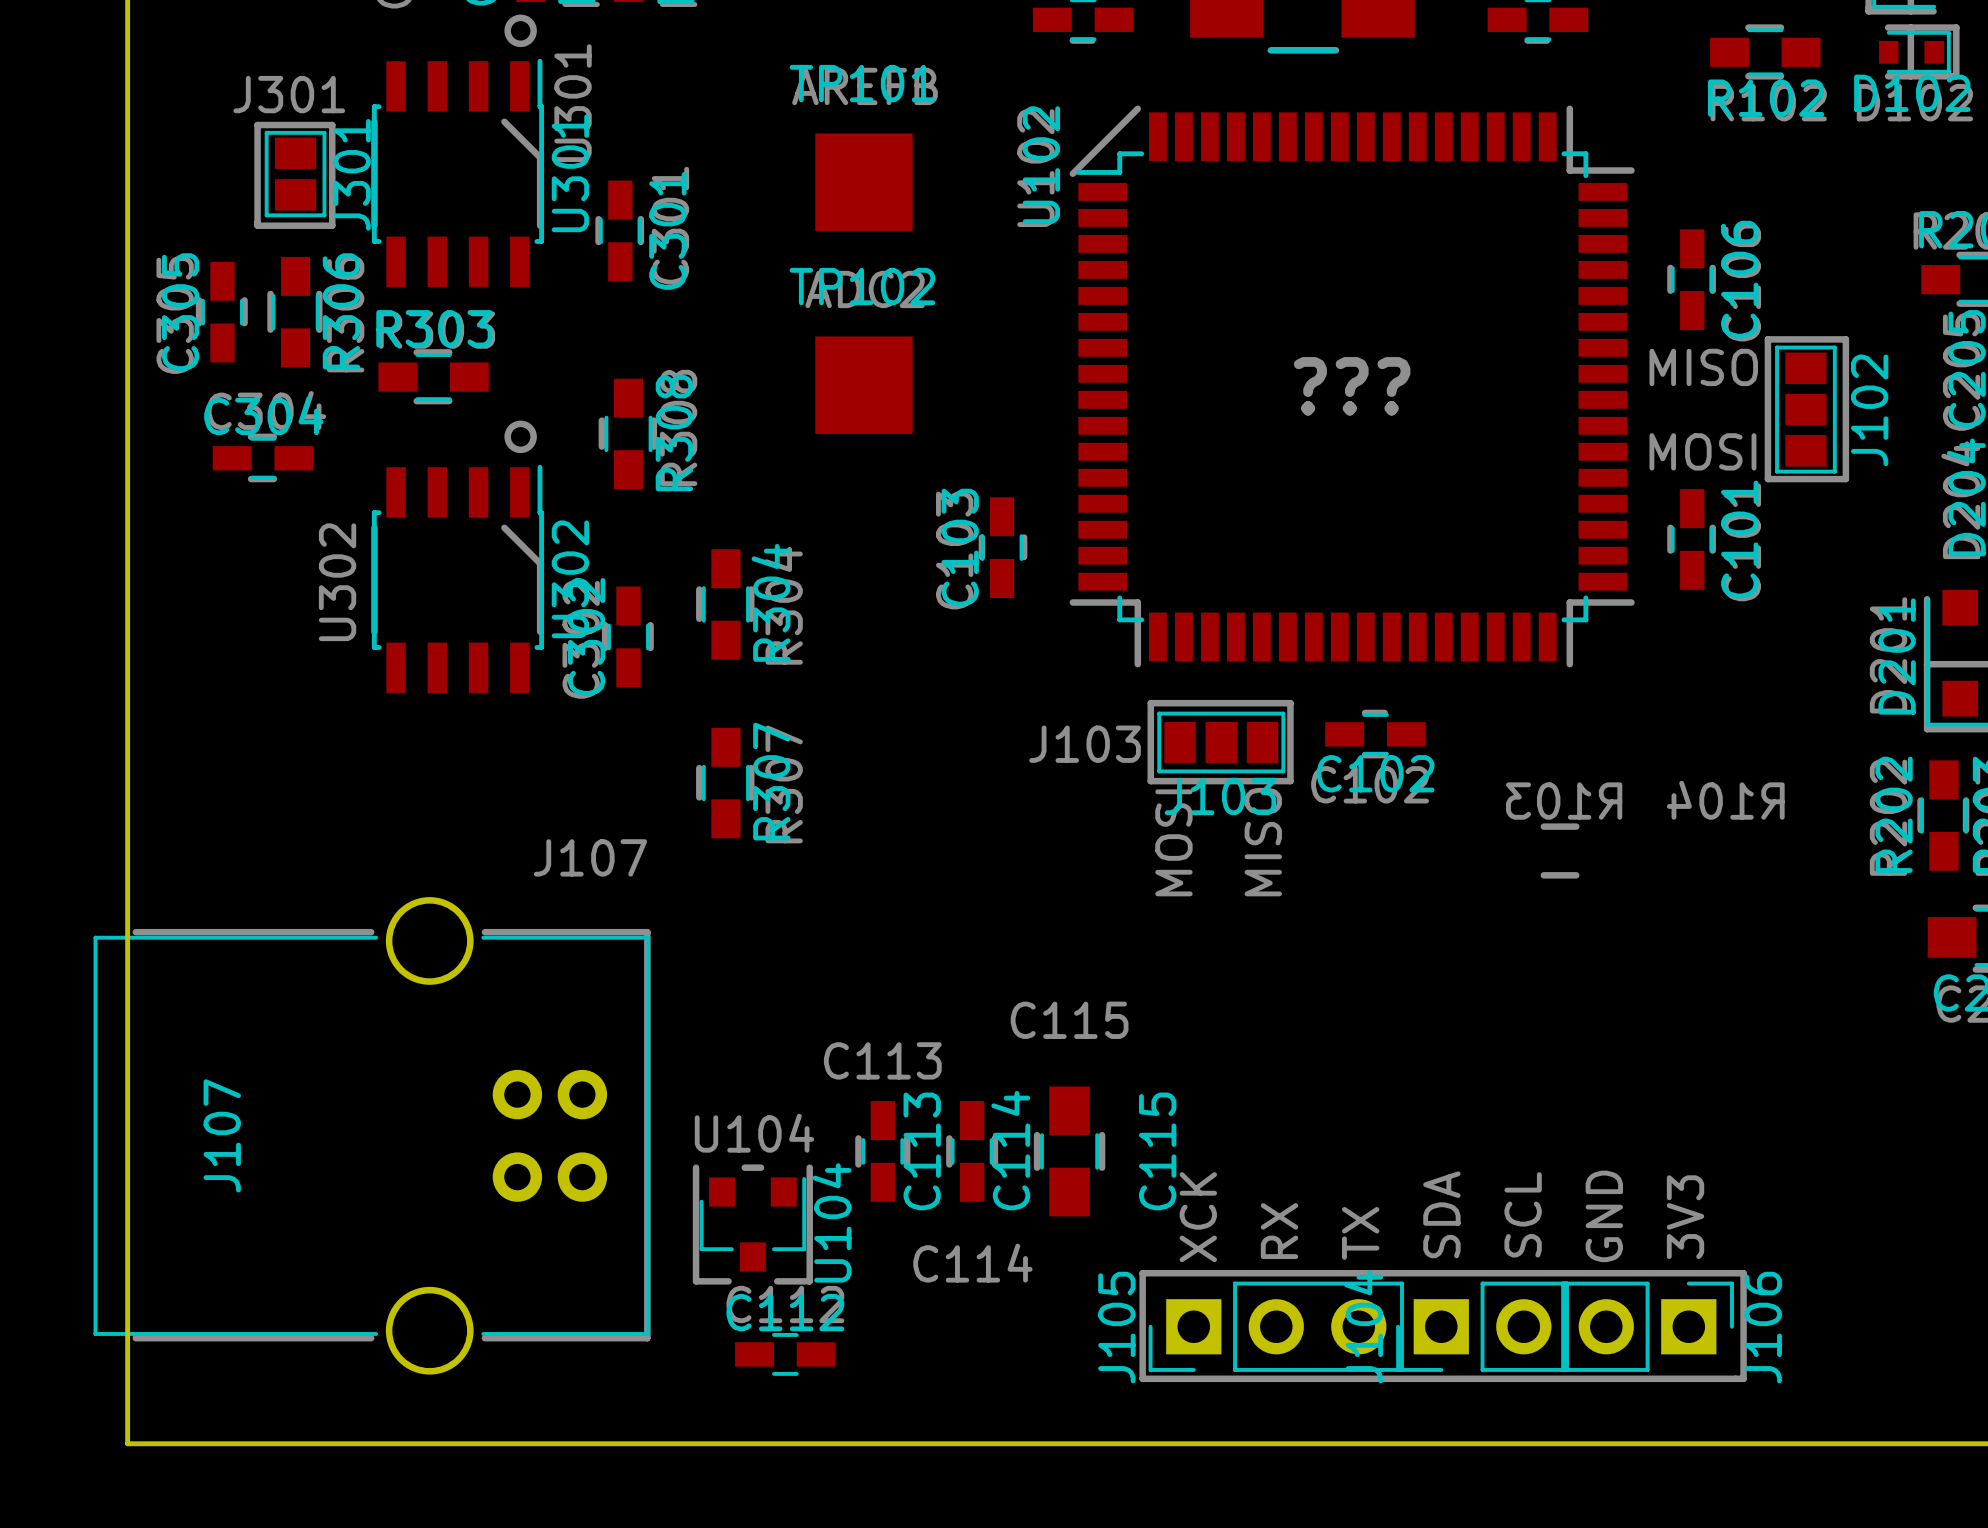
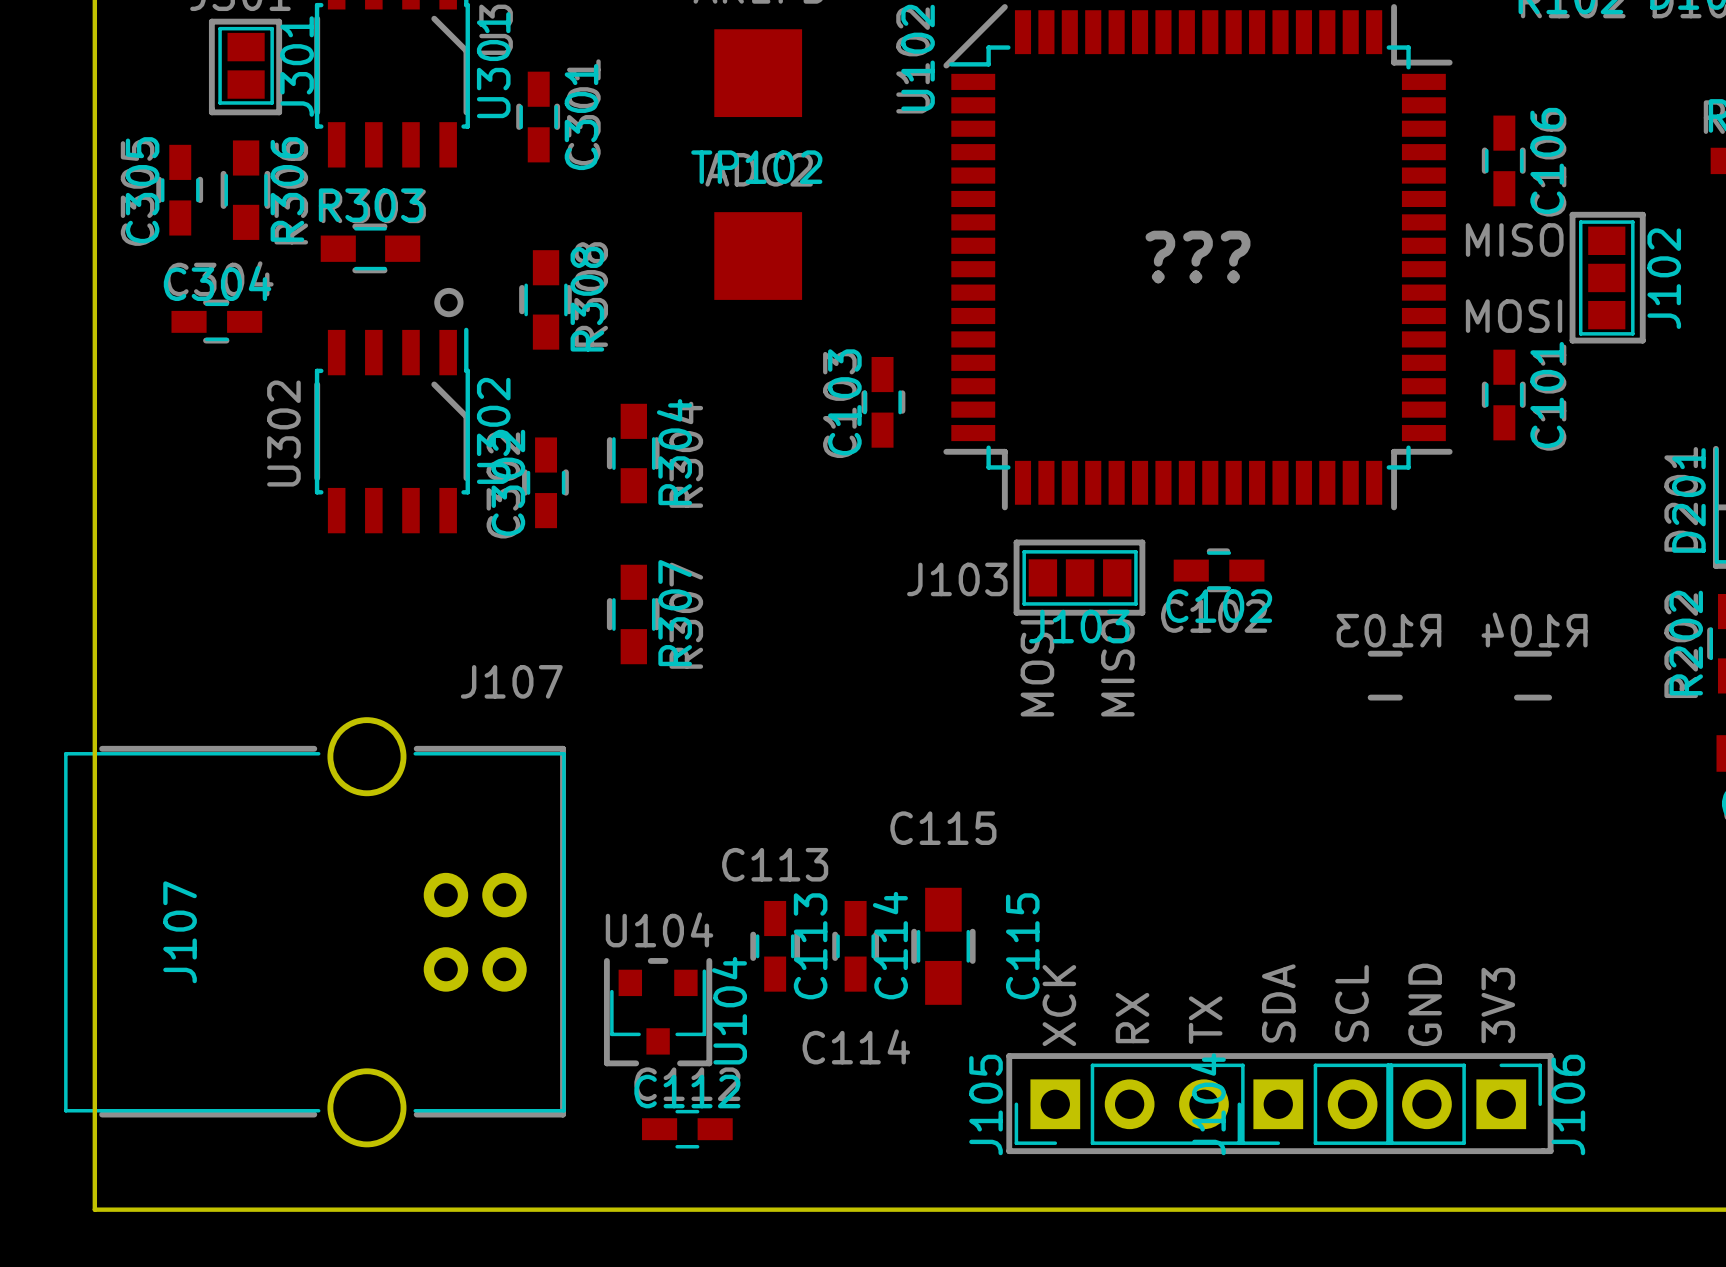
line: none -> (1516, 653) (1549, 653)
line: none -> (1516, 697) (1549, 697)

